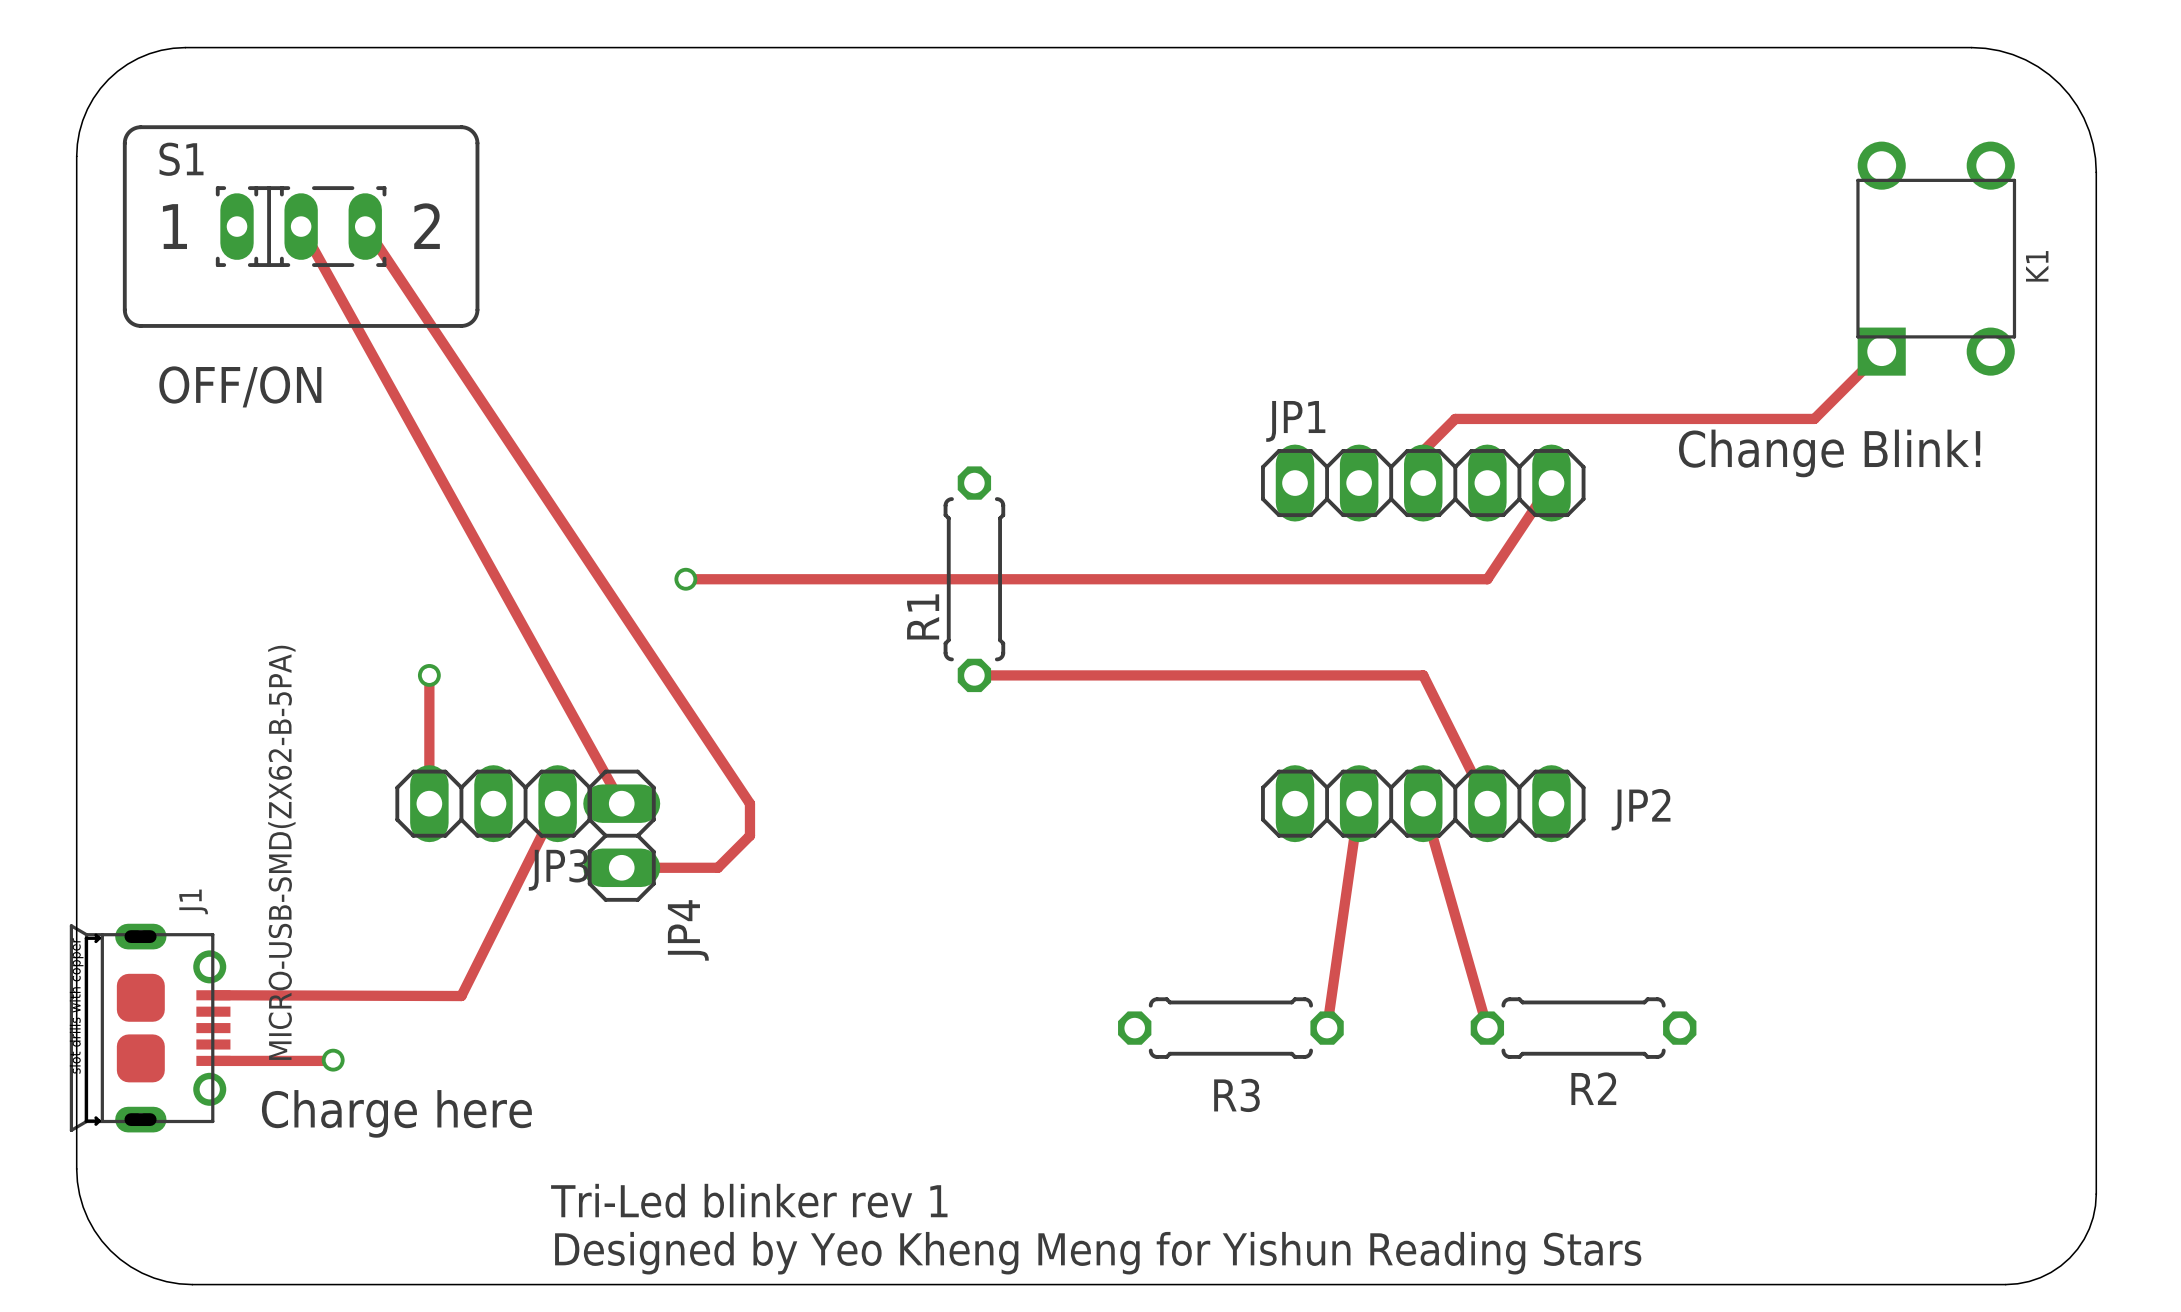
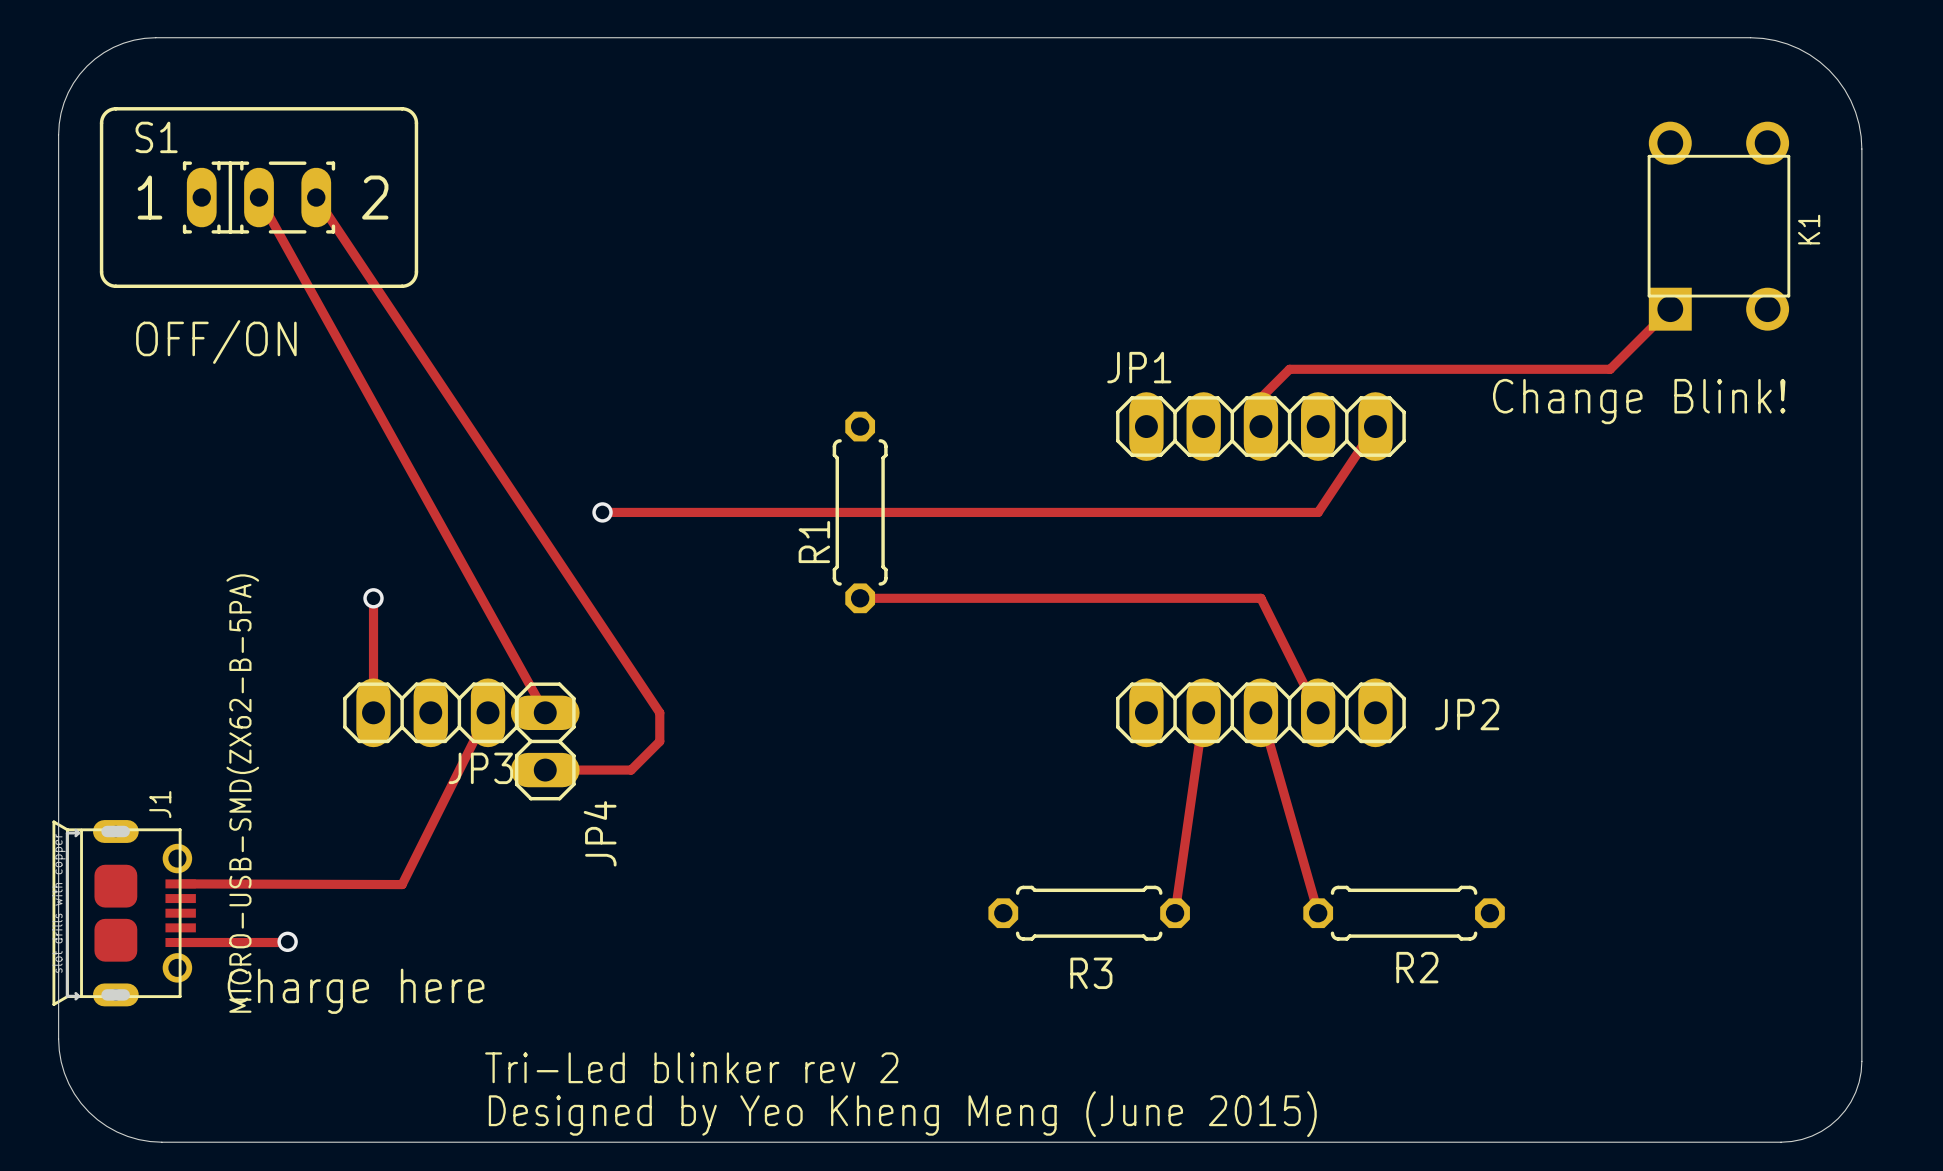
text: Tri-Led blinker rev 1 (749, 1200) -> Tri-Led blinker rev 2 (691, 1067)
text: Designed by Yeo Kheng Meng for Yishun Reading Stars (1098, 1253) -> Designed by Yeo Kheng Meng (June 2015) (902, 1114)

